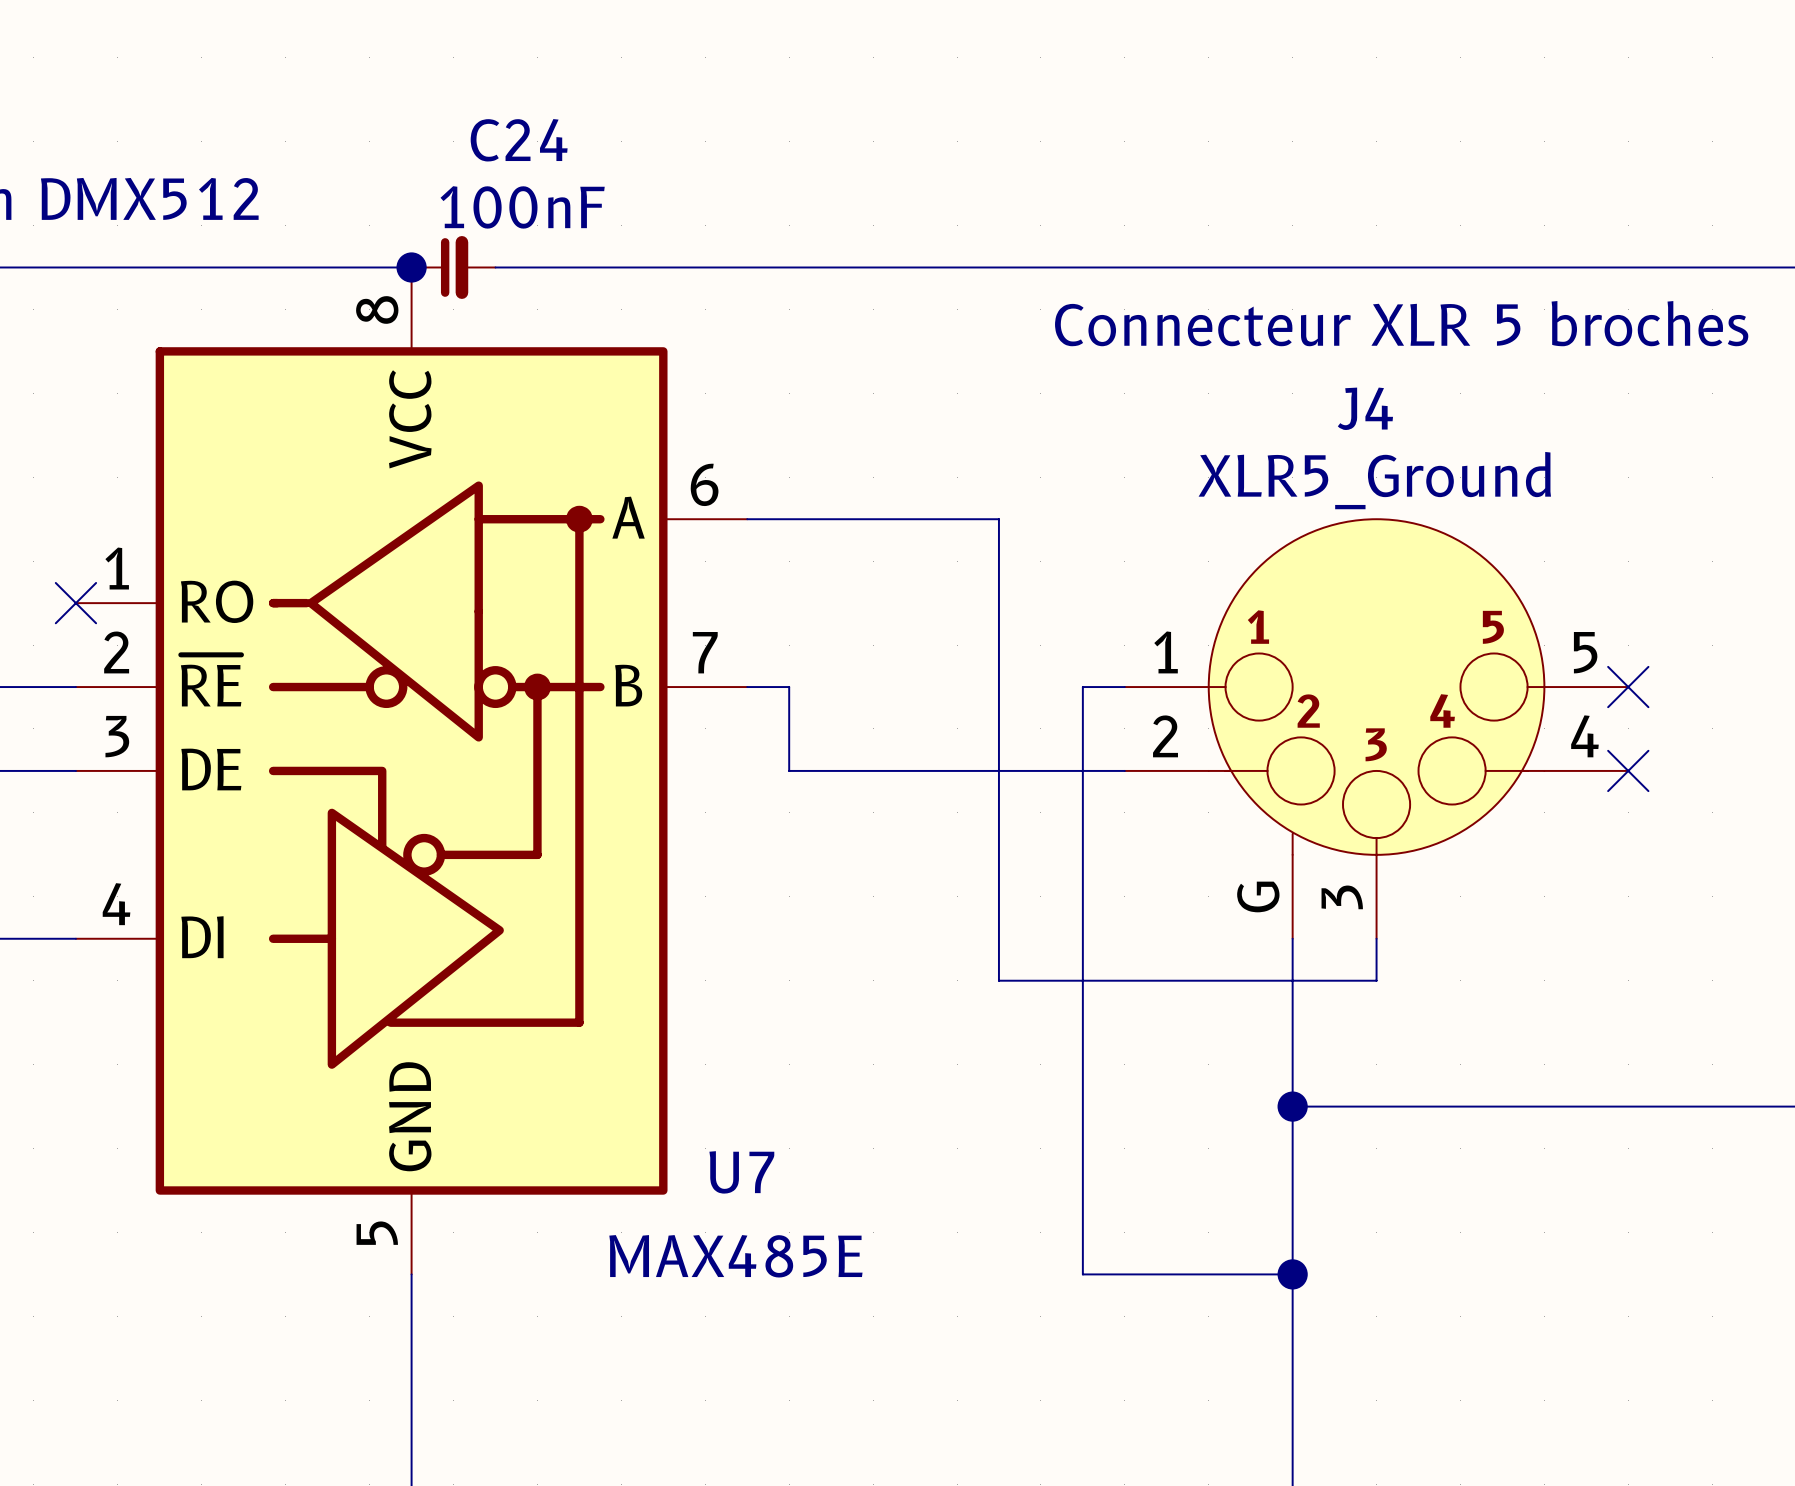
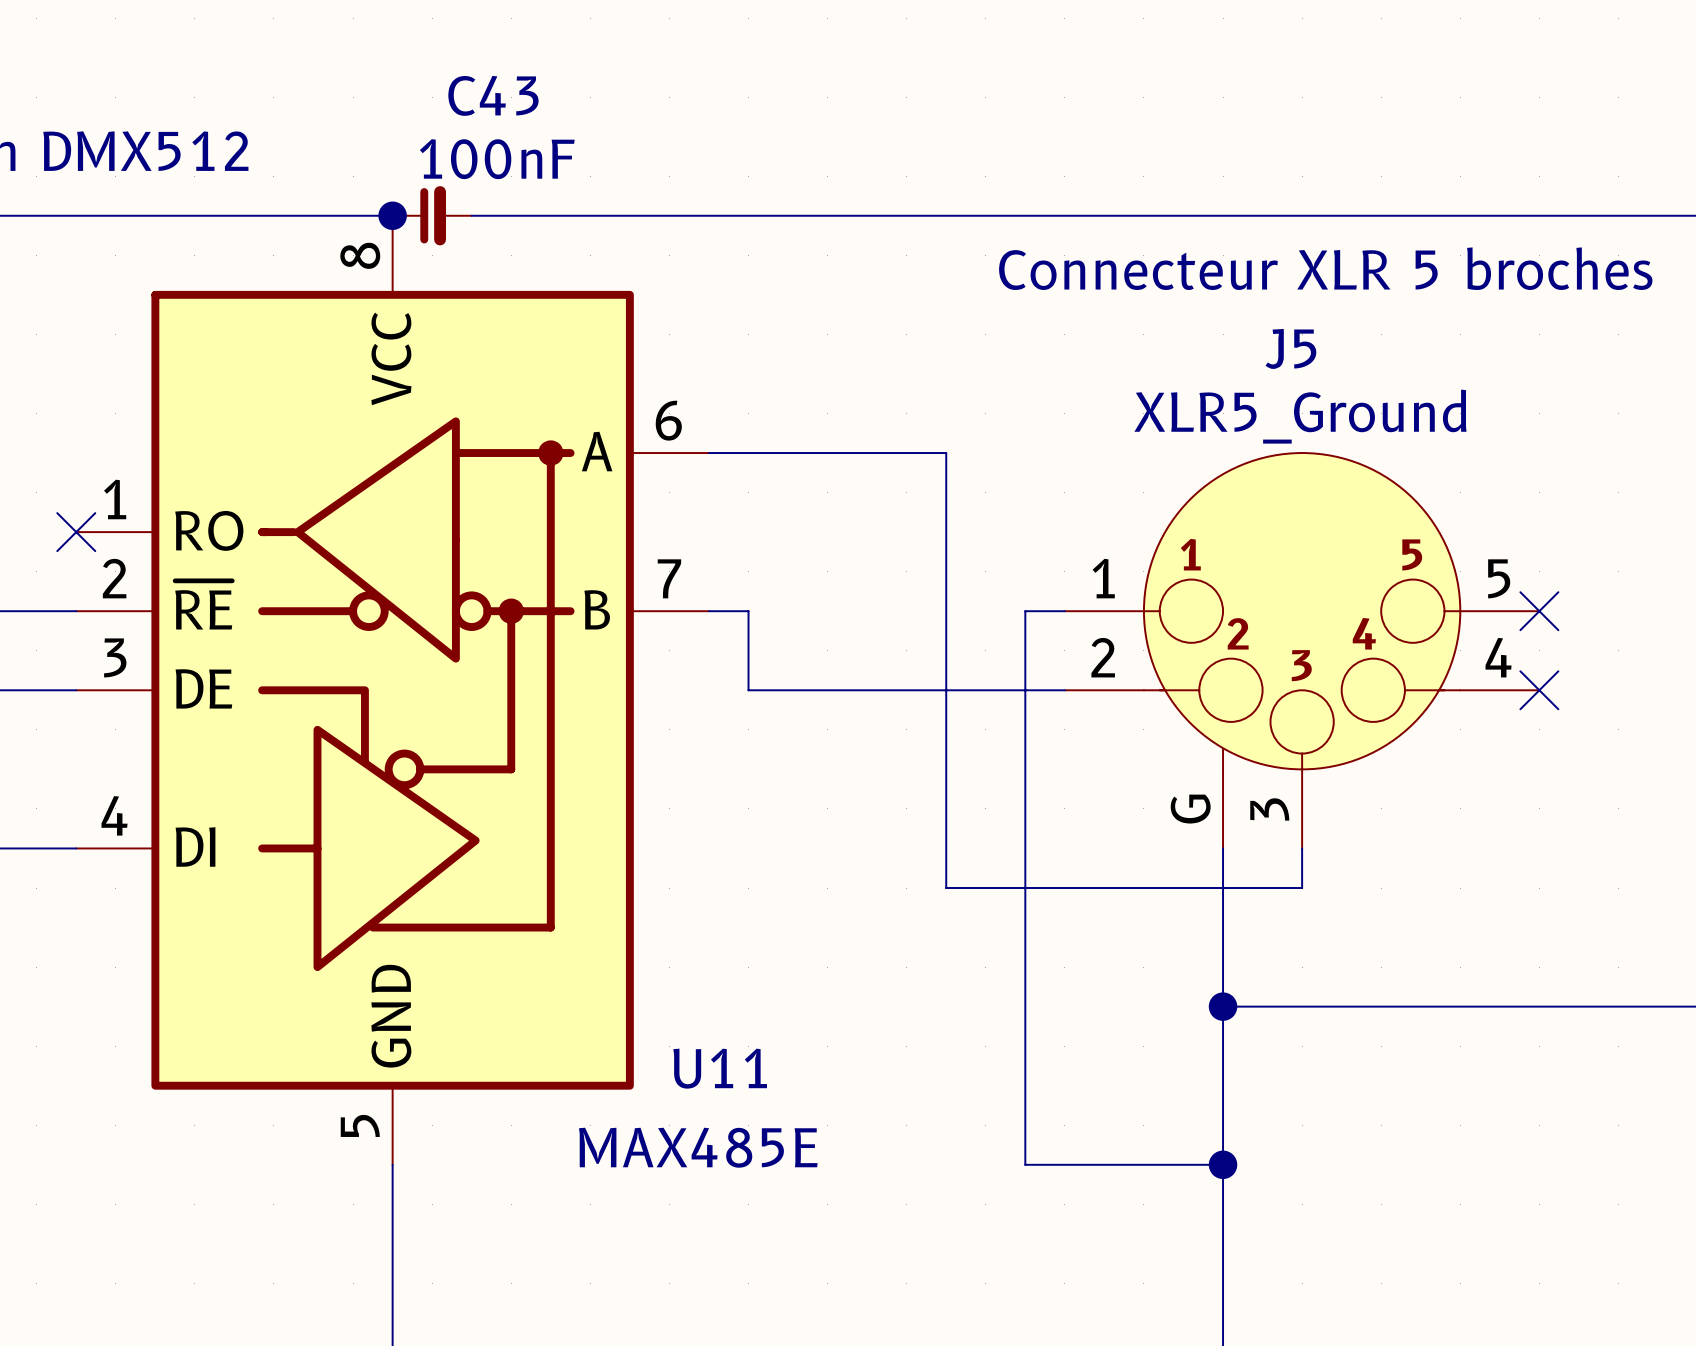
C24 name: C24 (519, 140) -> C43 (493, 95)
J4 name: J4 (1365, 408) -> J5 (1290, 348)
U7 name: U7 (741, 1172) -> U11 (720, 1068)

